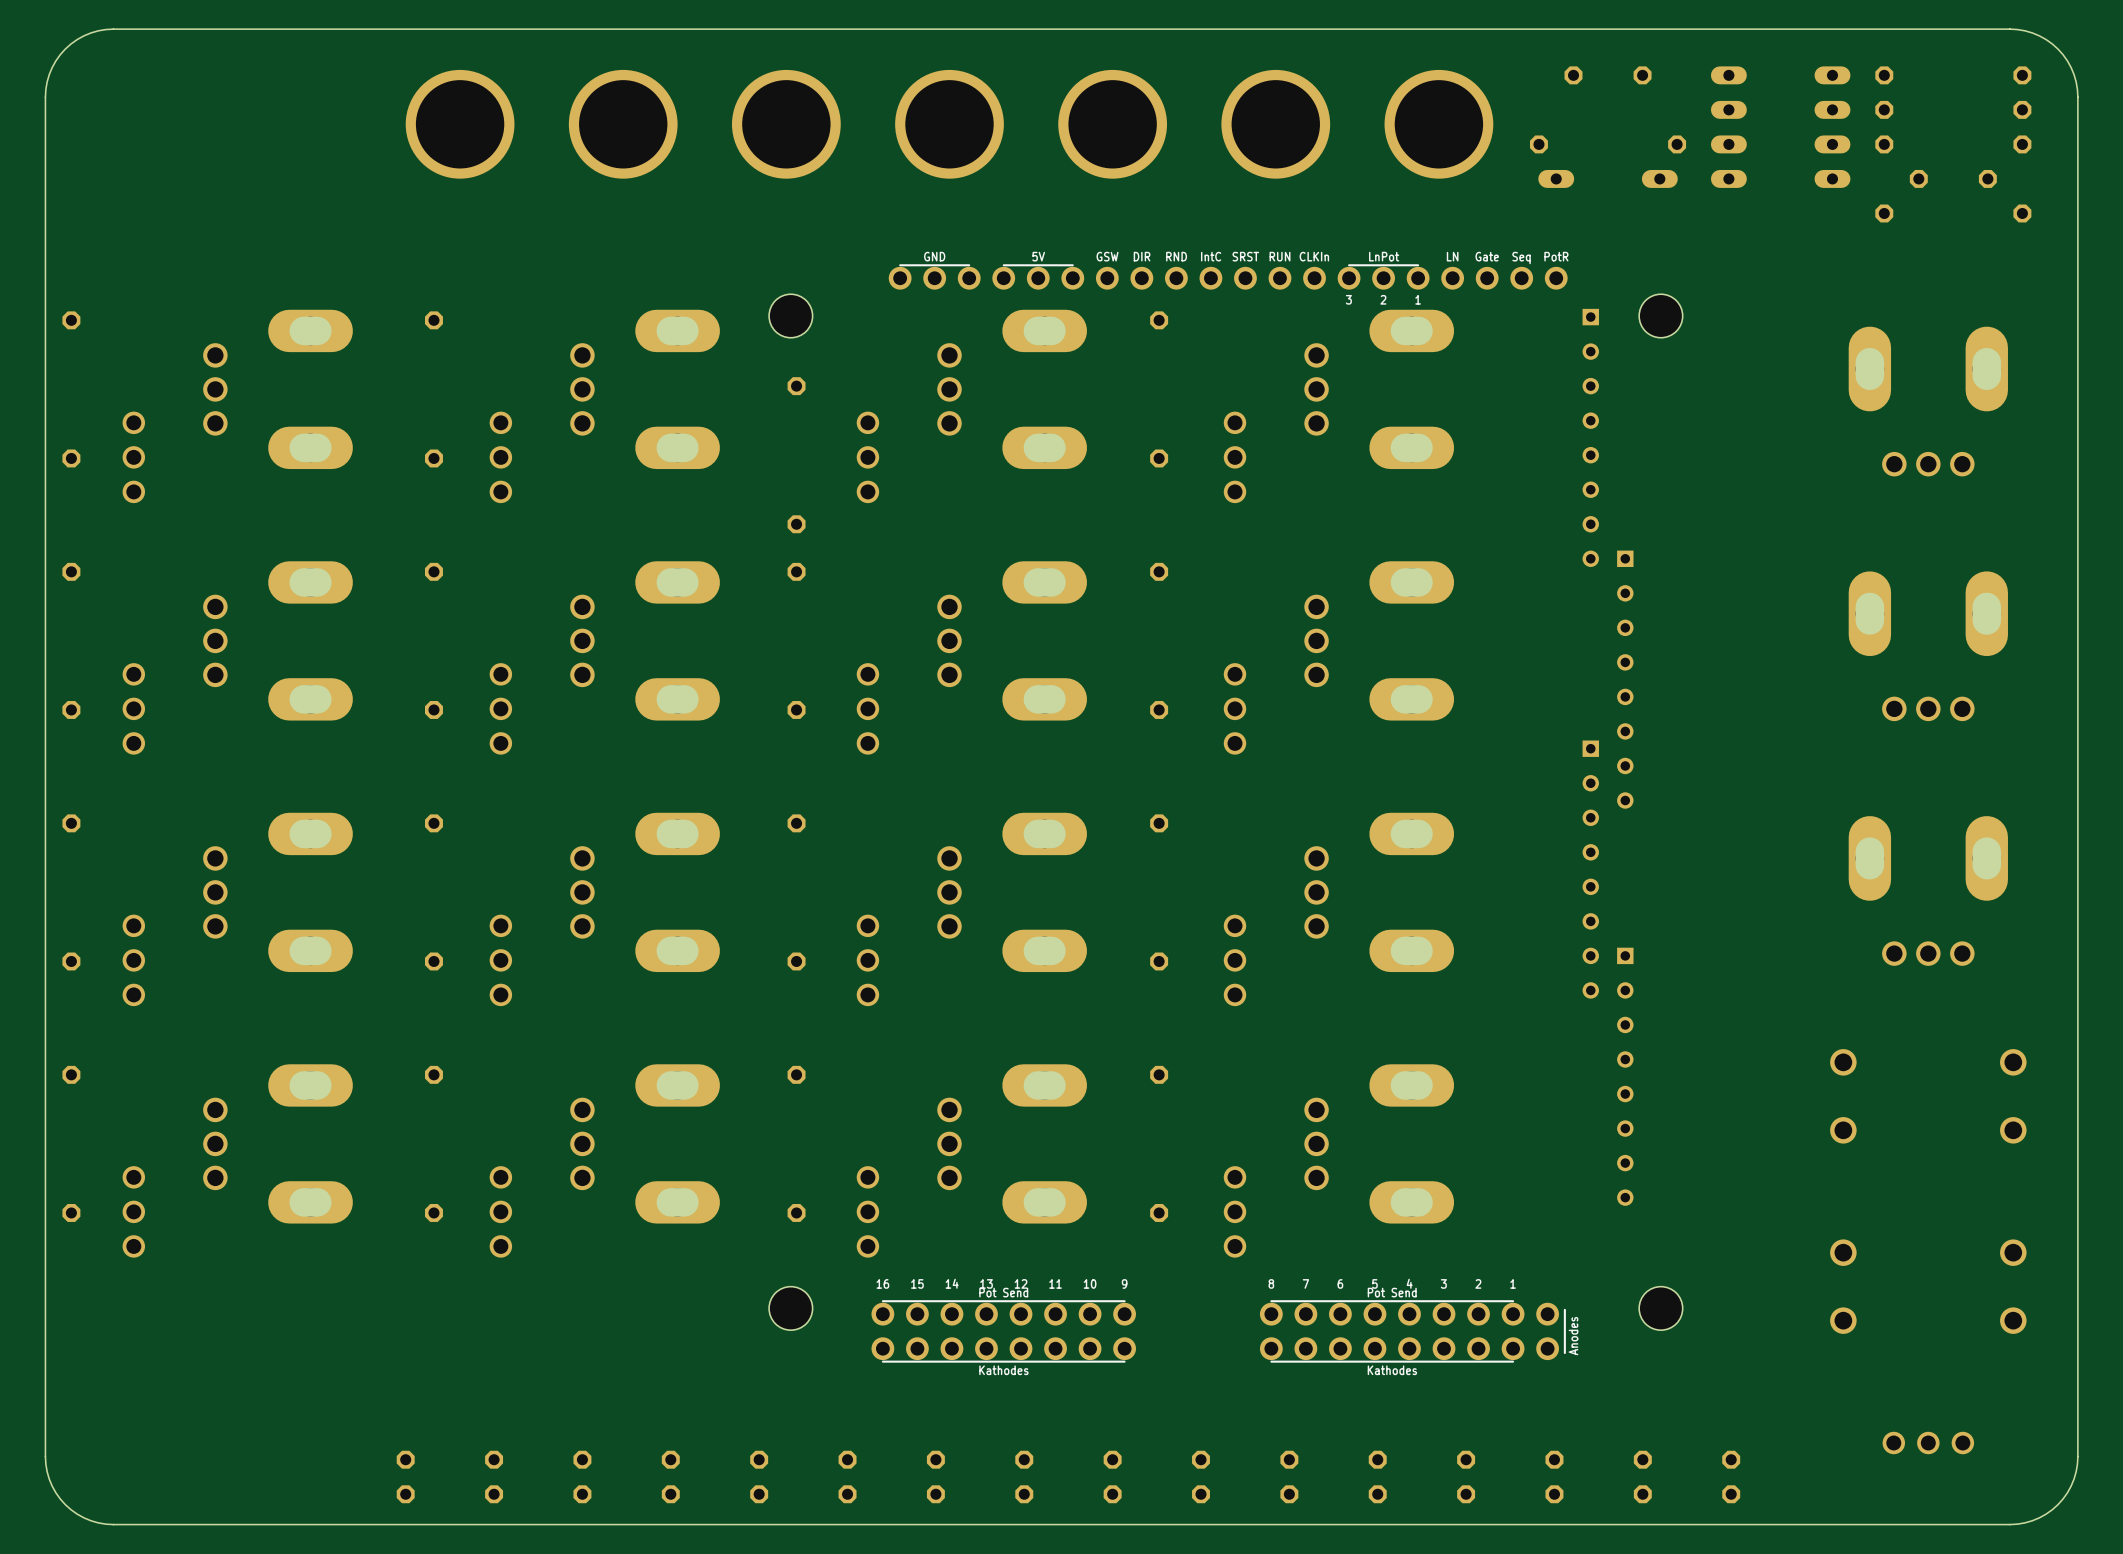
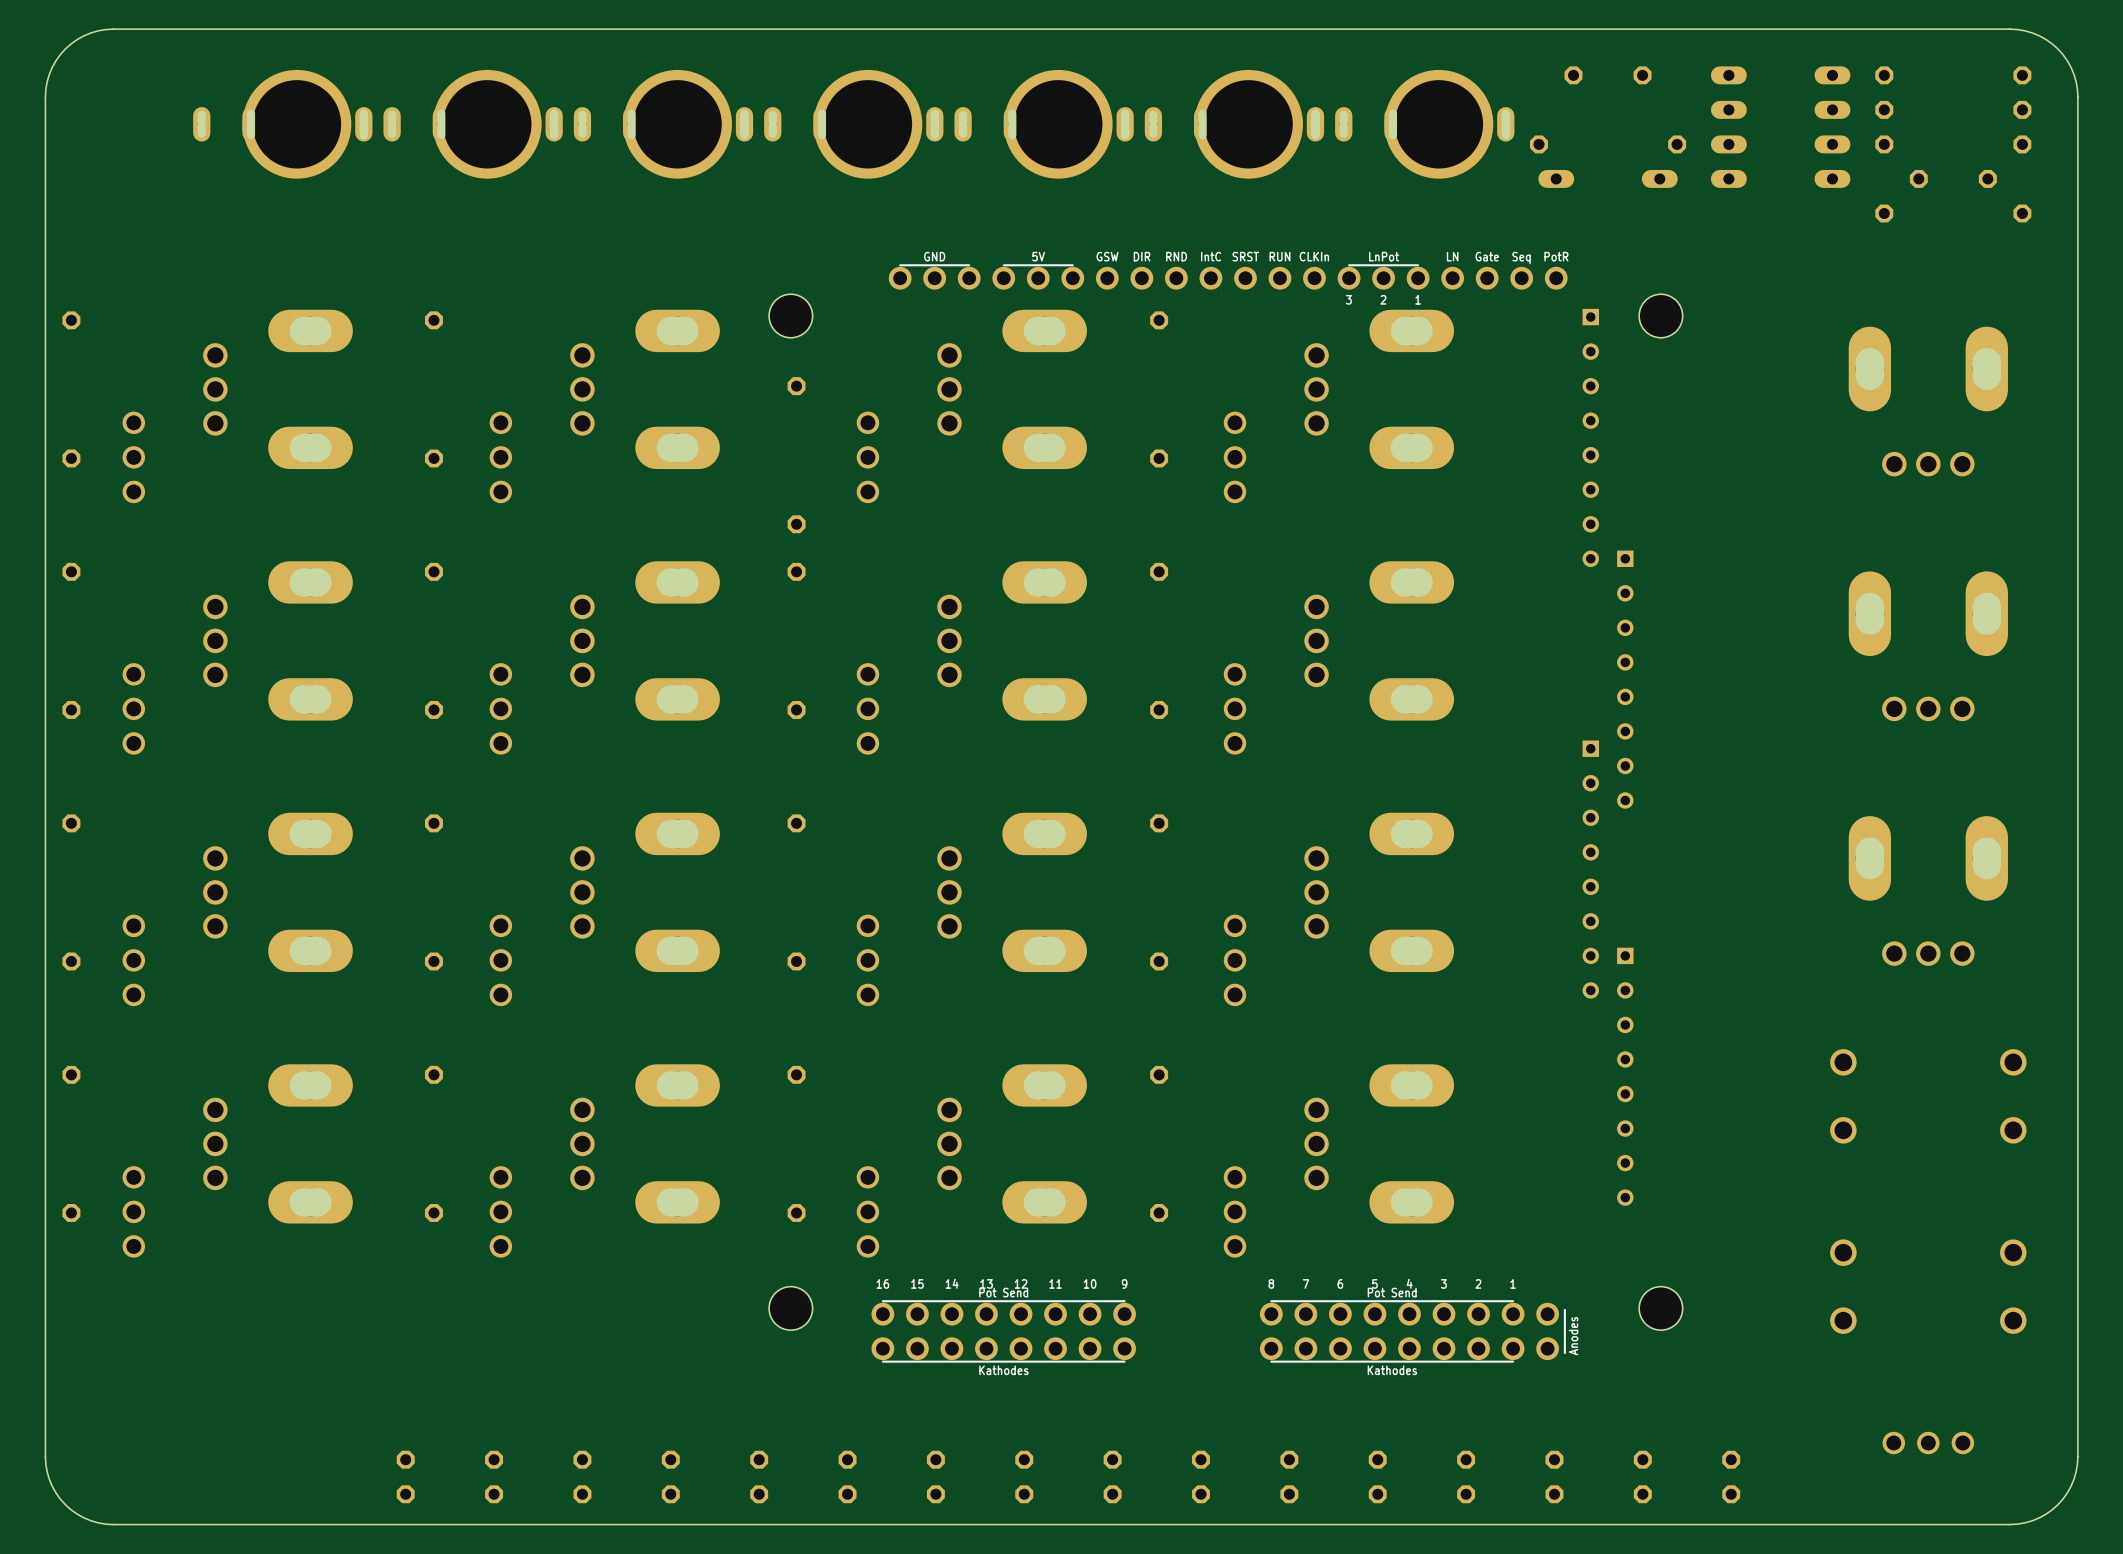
part footprint: [405, 69, 515, 179] -> [383, 69, 563, 179]
part: none -> (282, 124)
part: (623, 124) -> none
part: none -> (663, 124)
part: (786, 124) -> none
part: none -> (853, 124)
part: (949, 124) -> none
part: none -> (1044, 124)
part: (1112, 124) -> none
part: none -> (1234, 124)
part: (1275, 124) -> none
part: none -> (1424, 124)
part: (1438, 124) -> none

